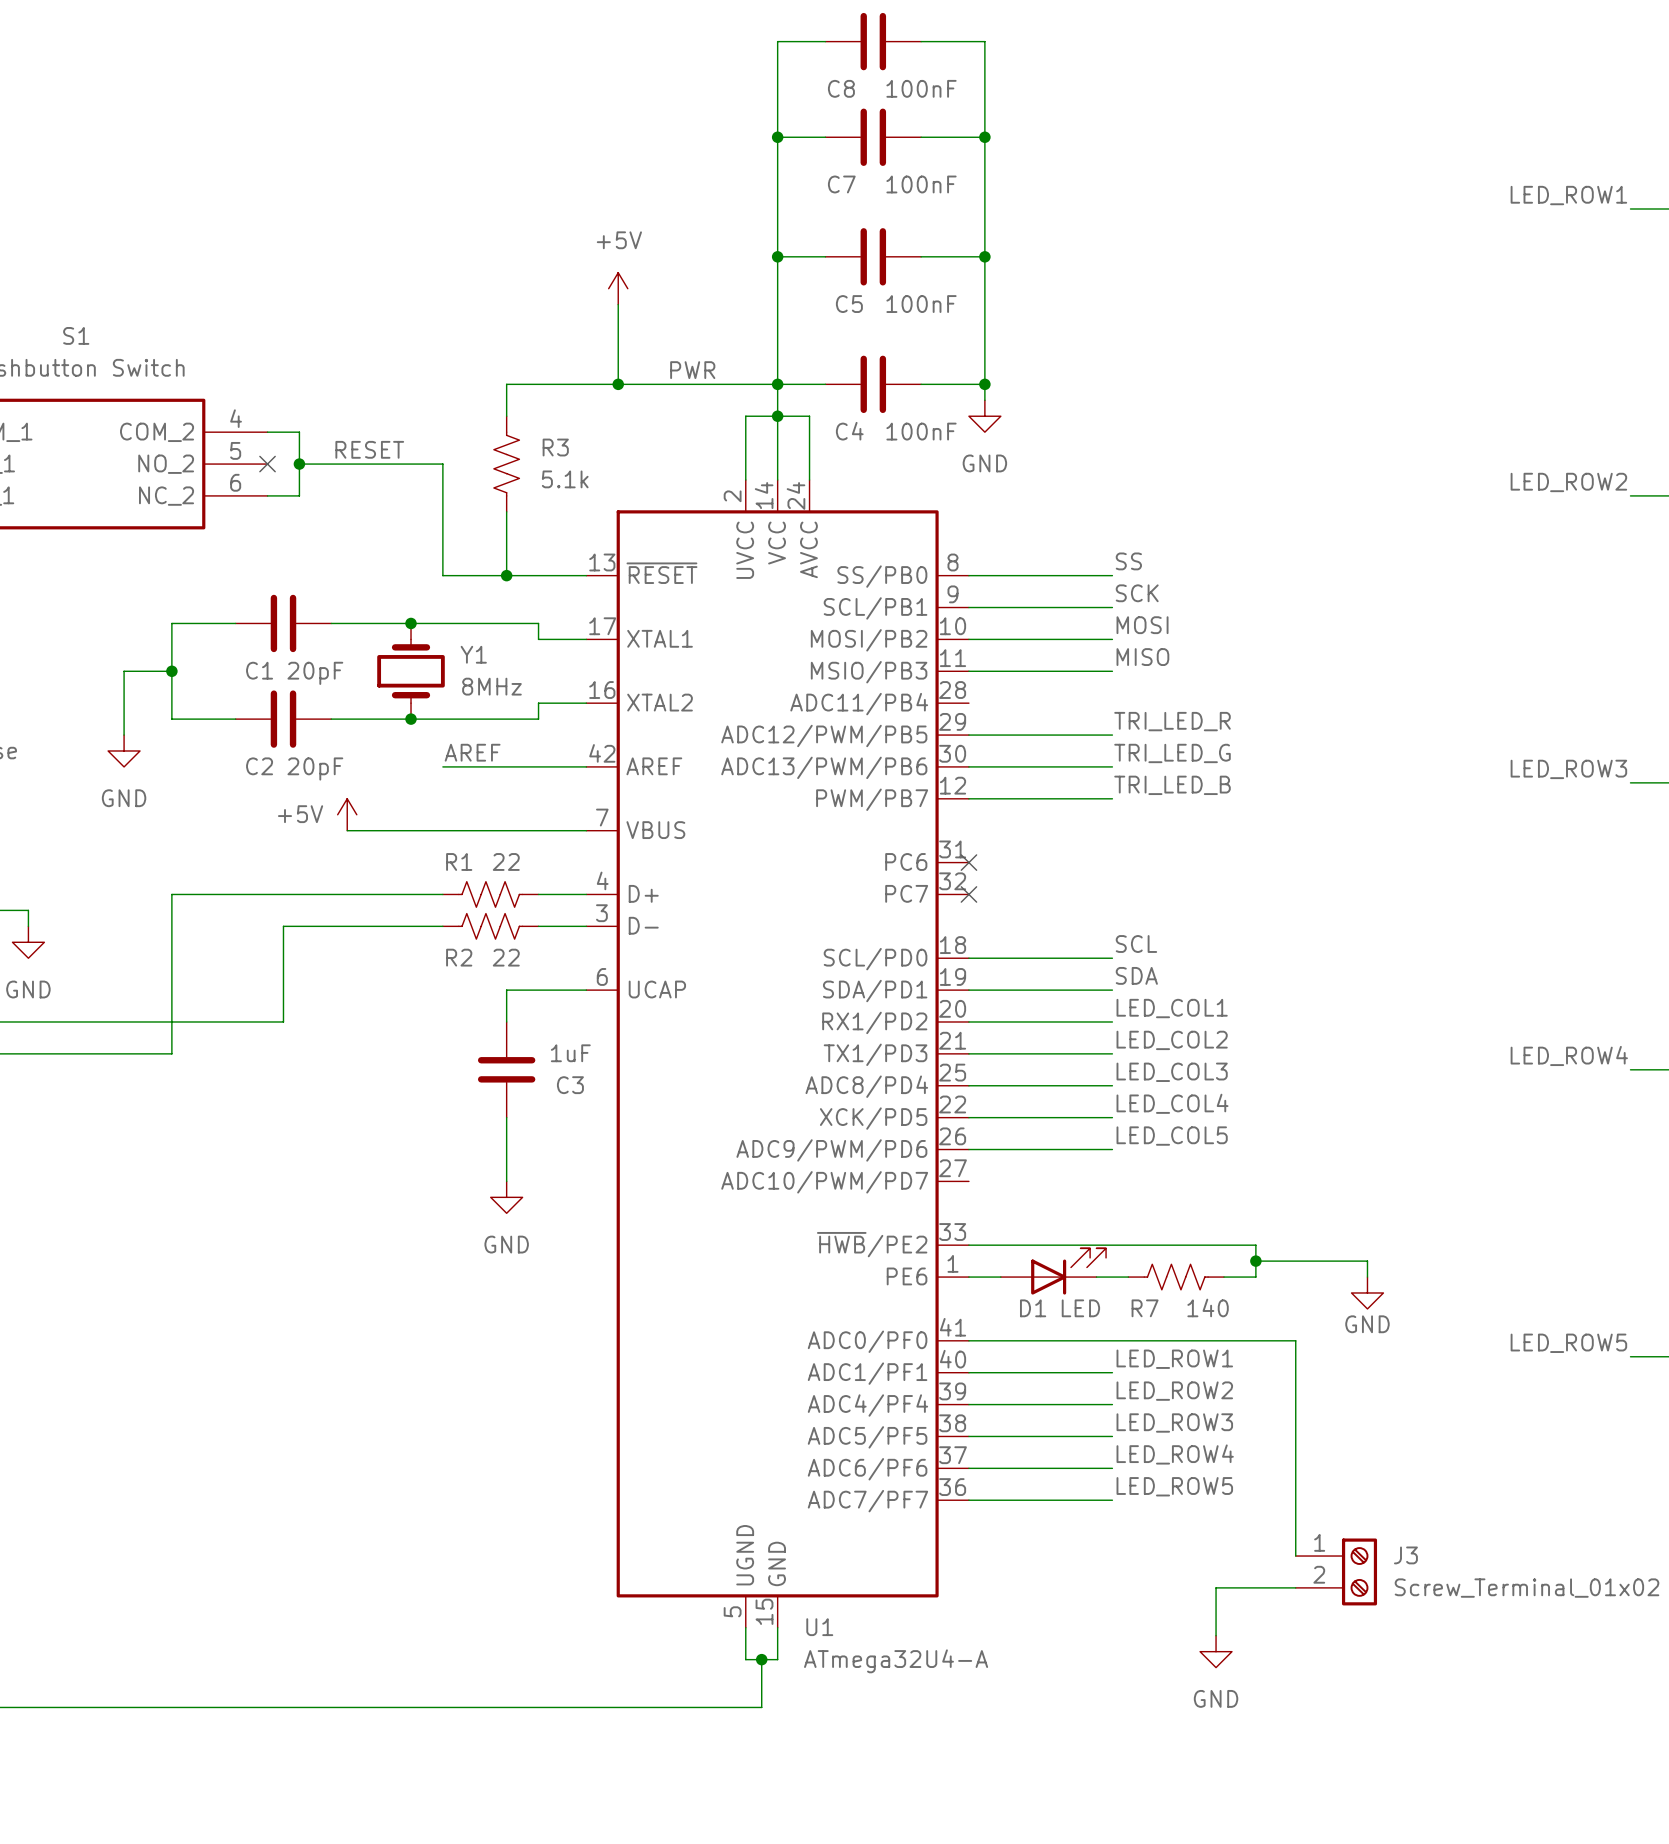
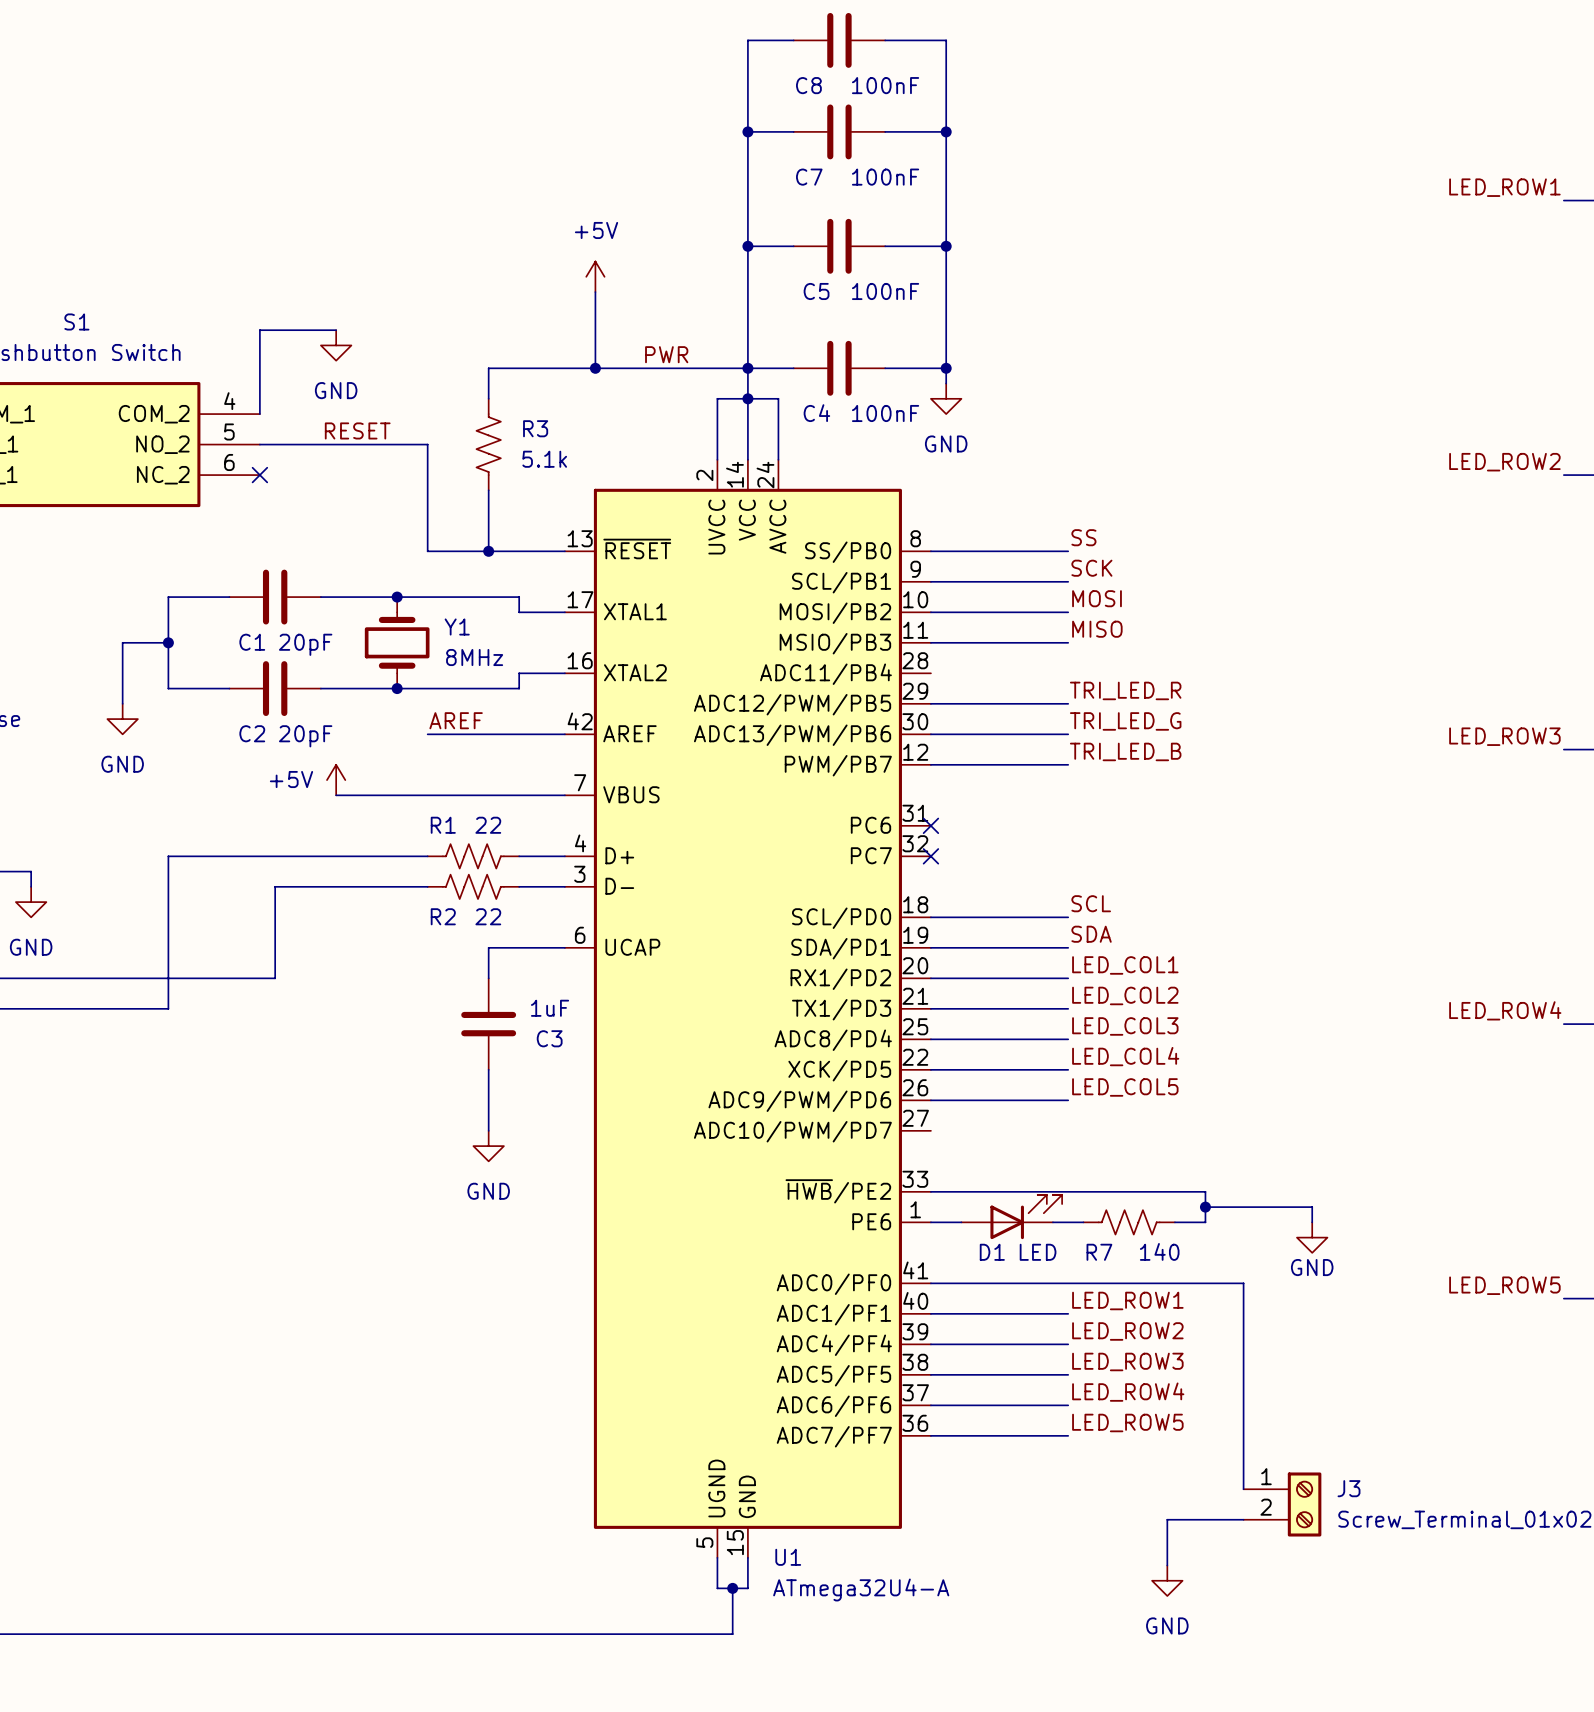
power symbol: none -> GND (336, 345)
wire: (267, 432) (299, 432) (299, 495) (267, 495) -> (259, 414) (259, 330) (336, 330)
wire: none -> (259, 444) (290, 444)
no-connect mark position: (267, 464) -> (259, 475)
junction: (299, 464) -> none

